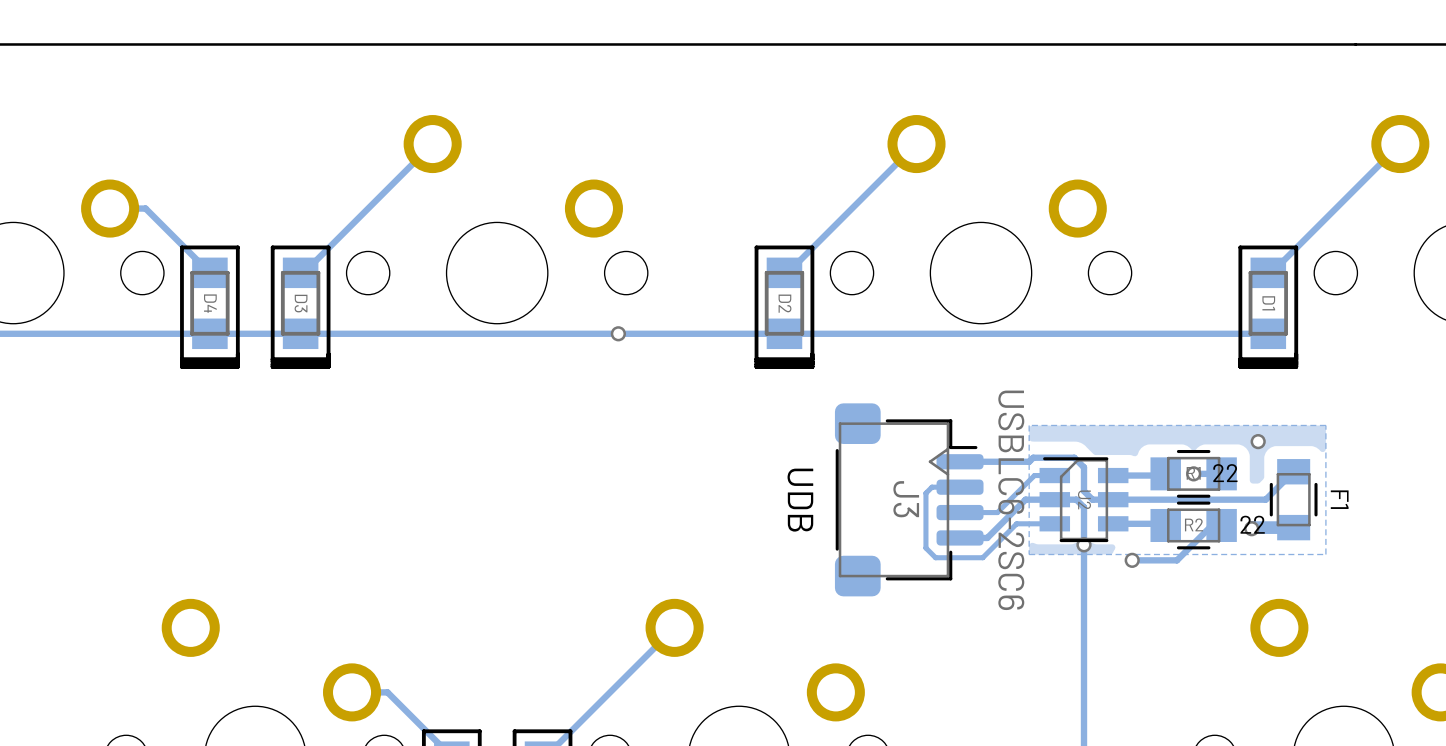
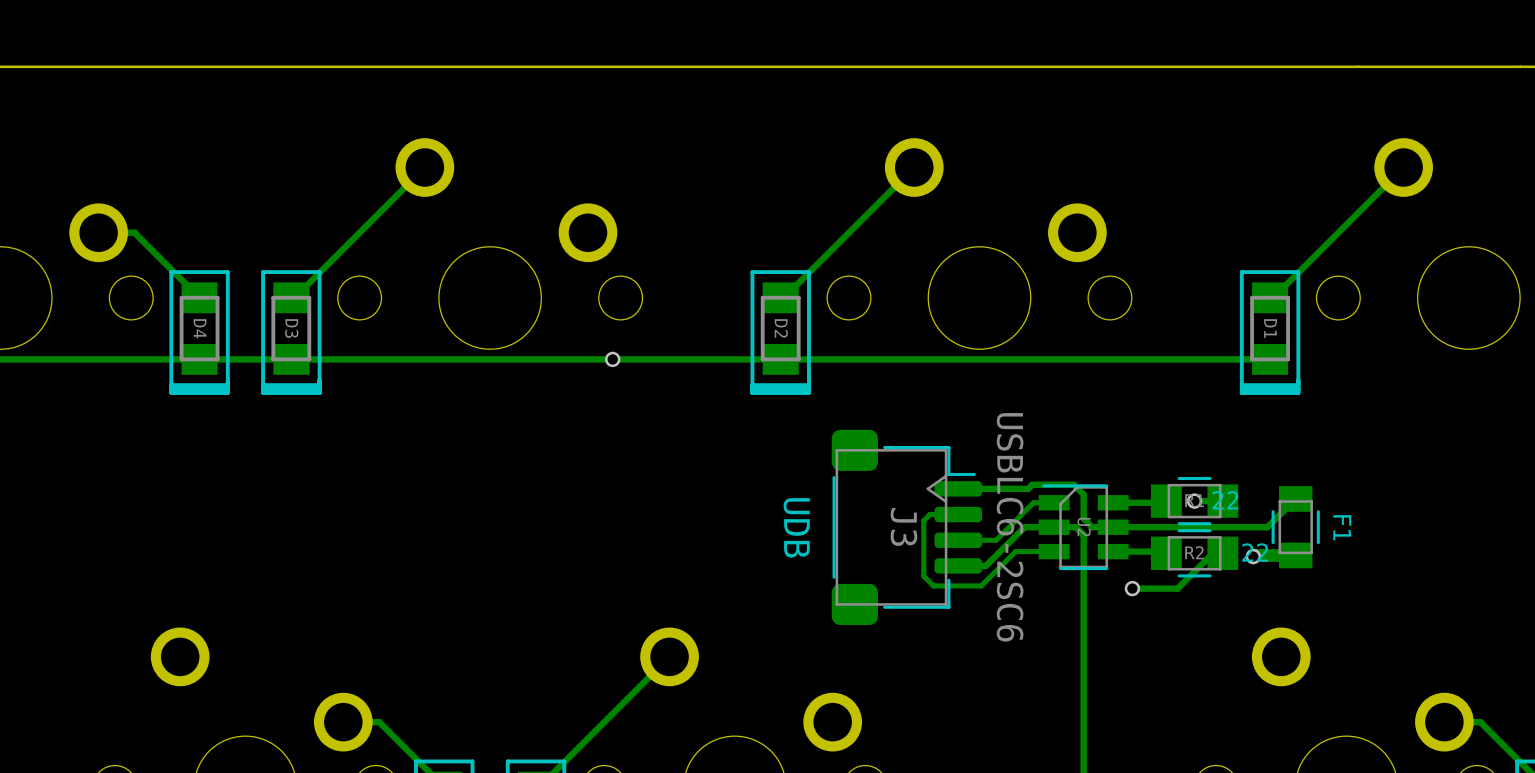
zone outline: (1325, 425) (1325, 554) (1029, 554) (1029, 425) (1325, 425) -> none
via: (1258, 441) -> none
via: (1084, 544) -> none

